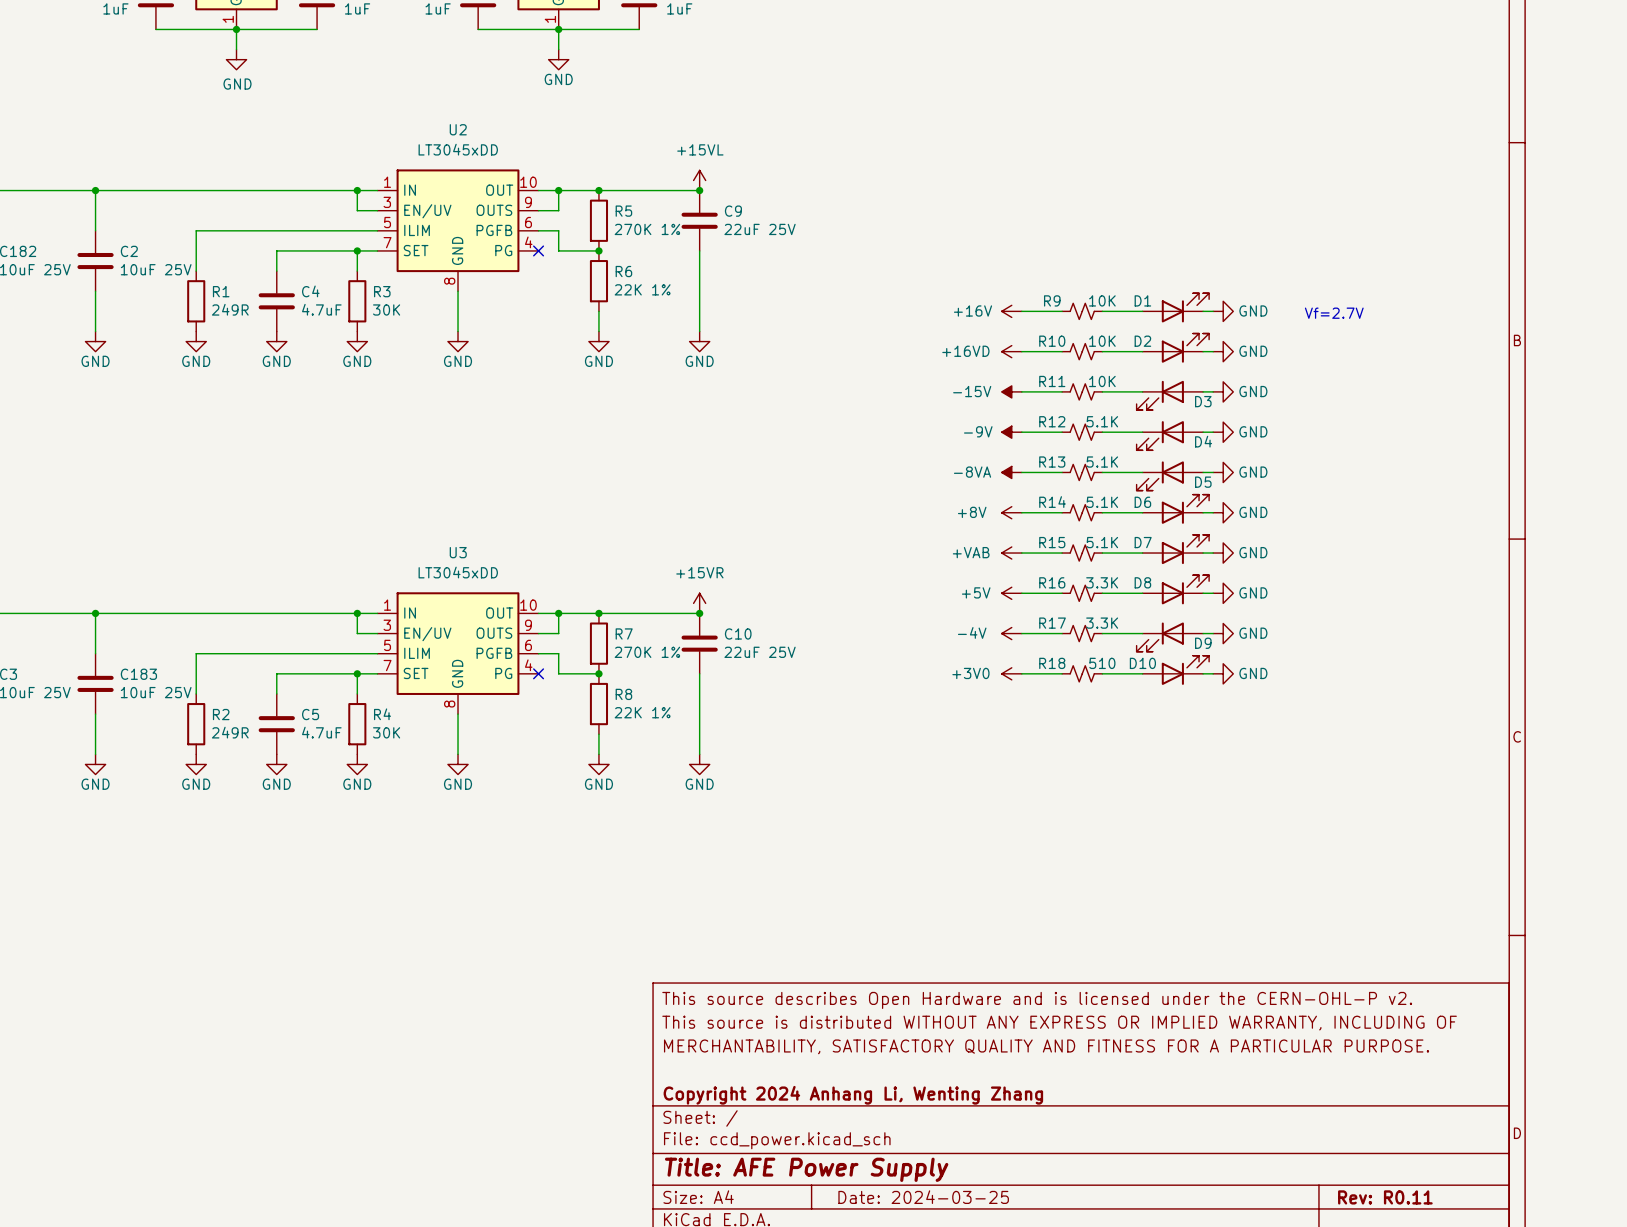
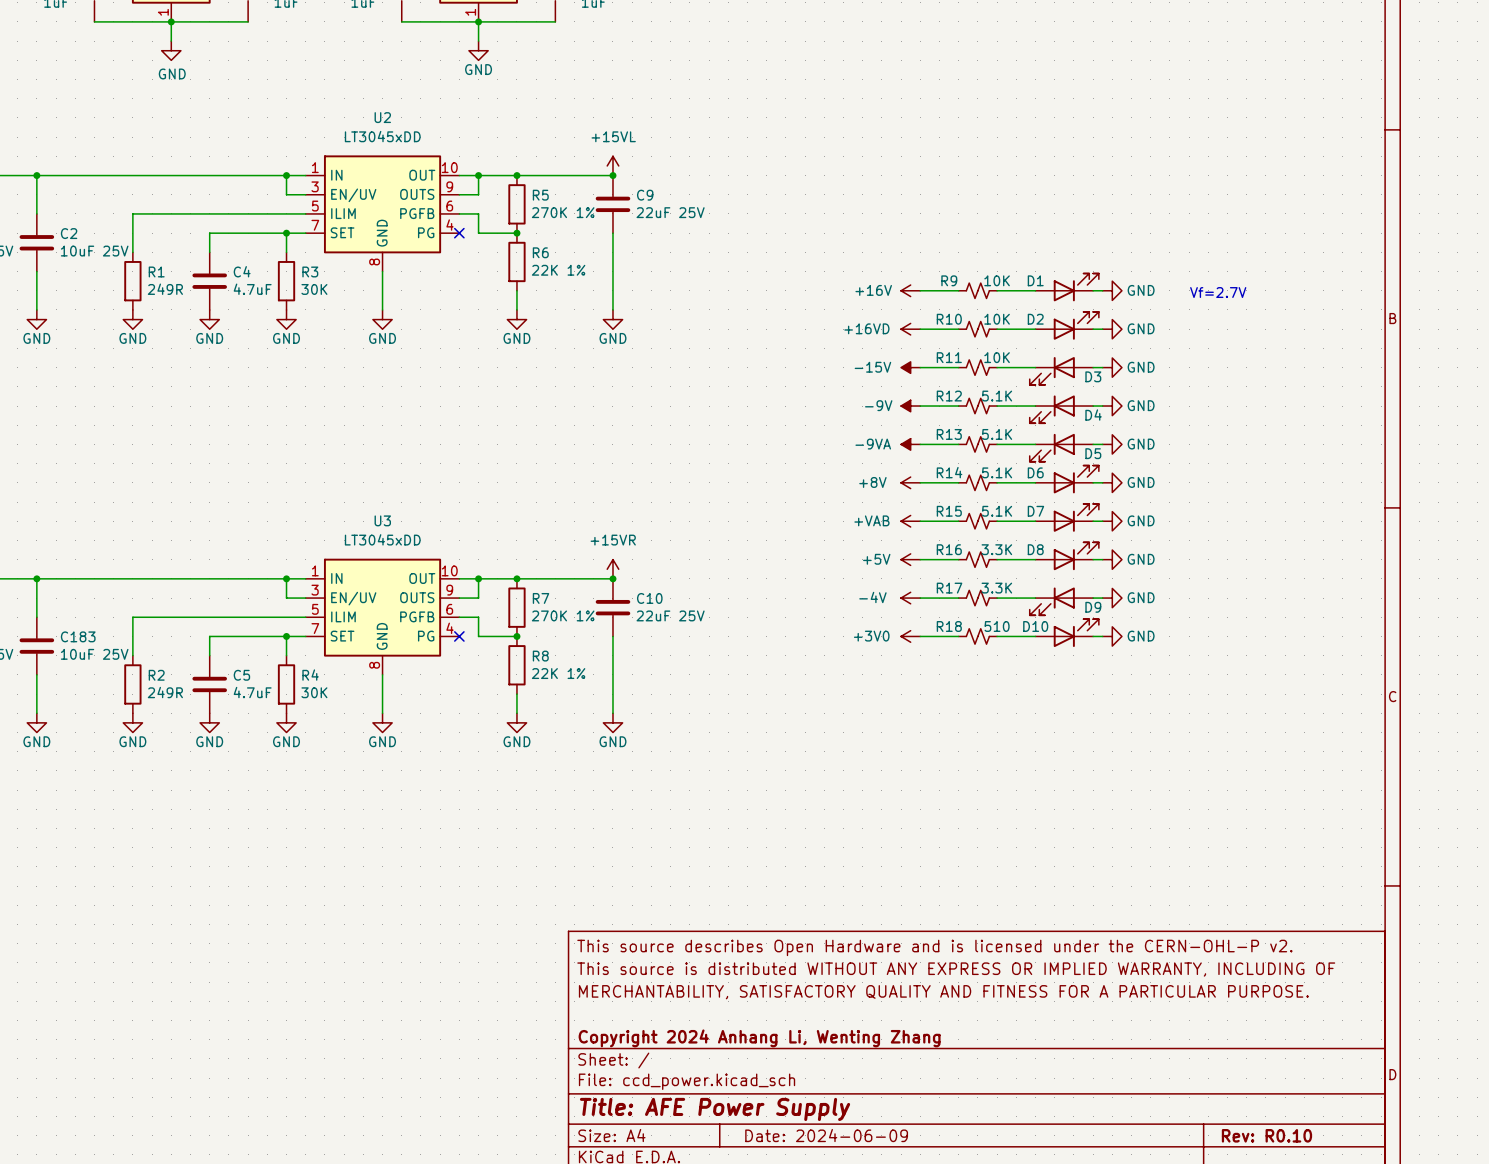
power symbol: -8VA (1011, 472) -> -9VA (910, 444)
title block: Date: 2024-03-25 (923, 1197) -> Date: 2024-06-09 (826, 1135)
title block: Rev: R0.11 (1385, 1197) -> Rev: R0.10 (1266, 1135)

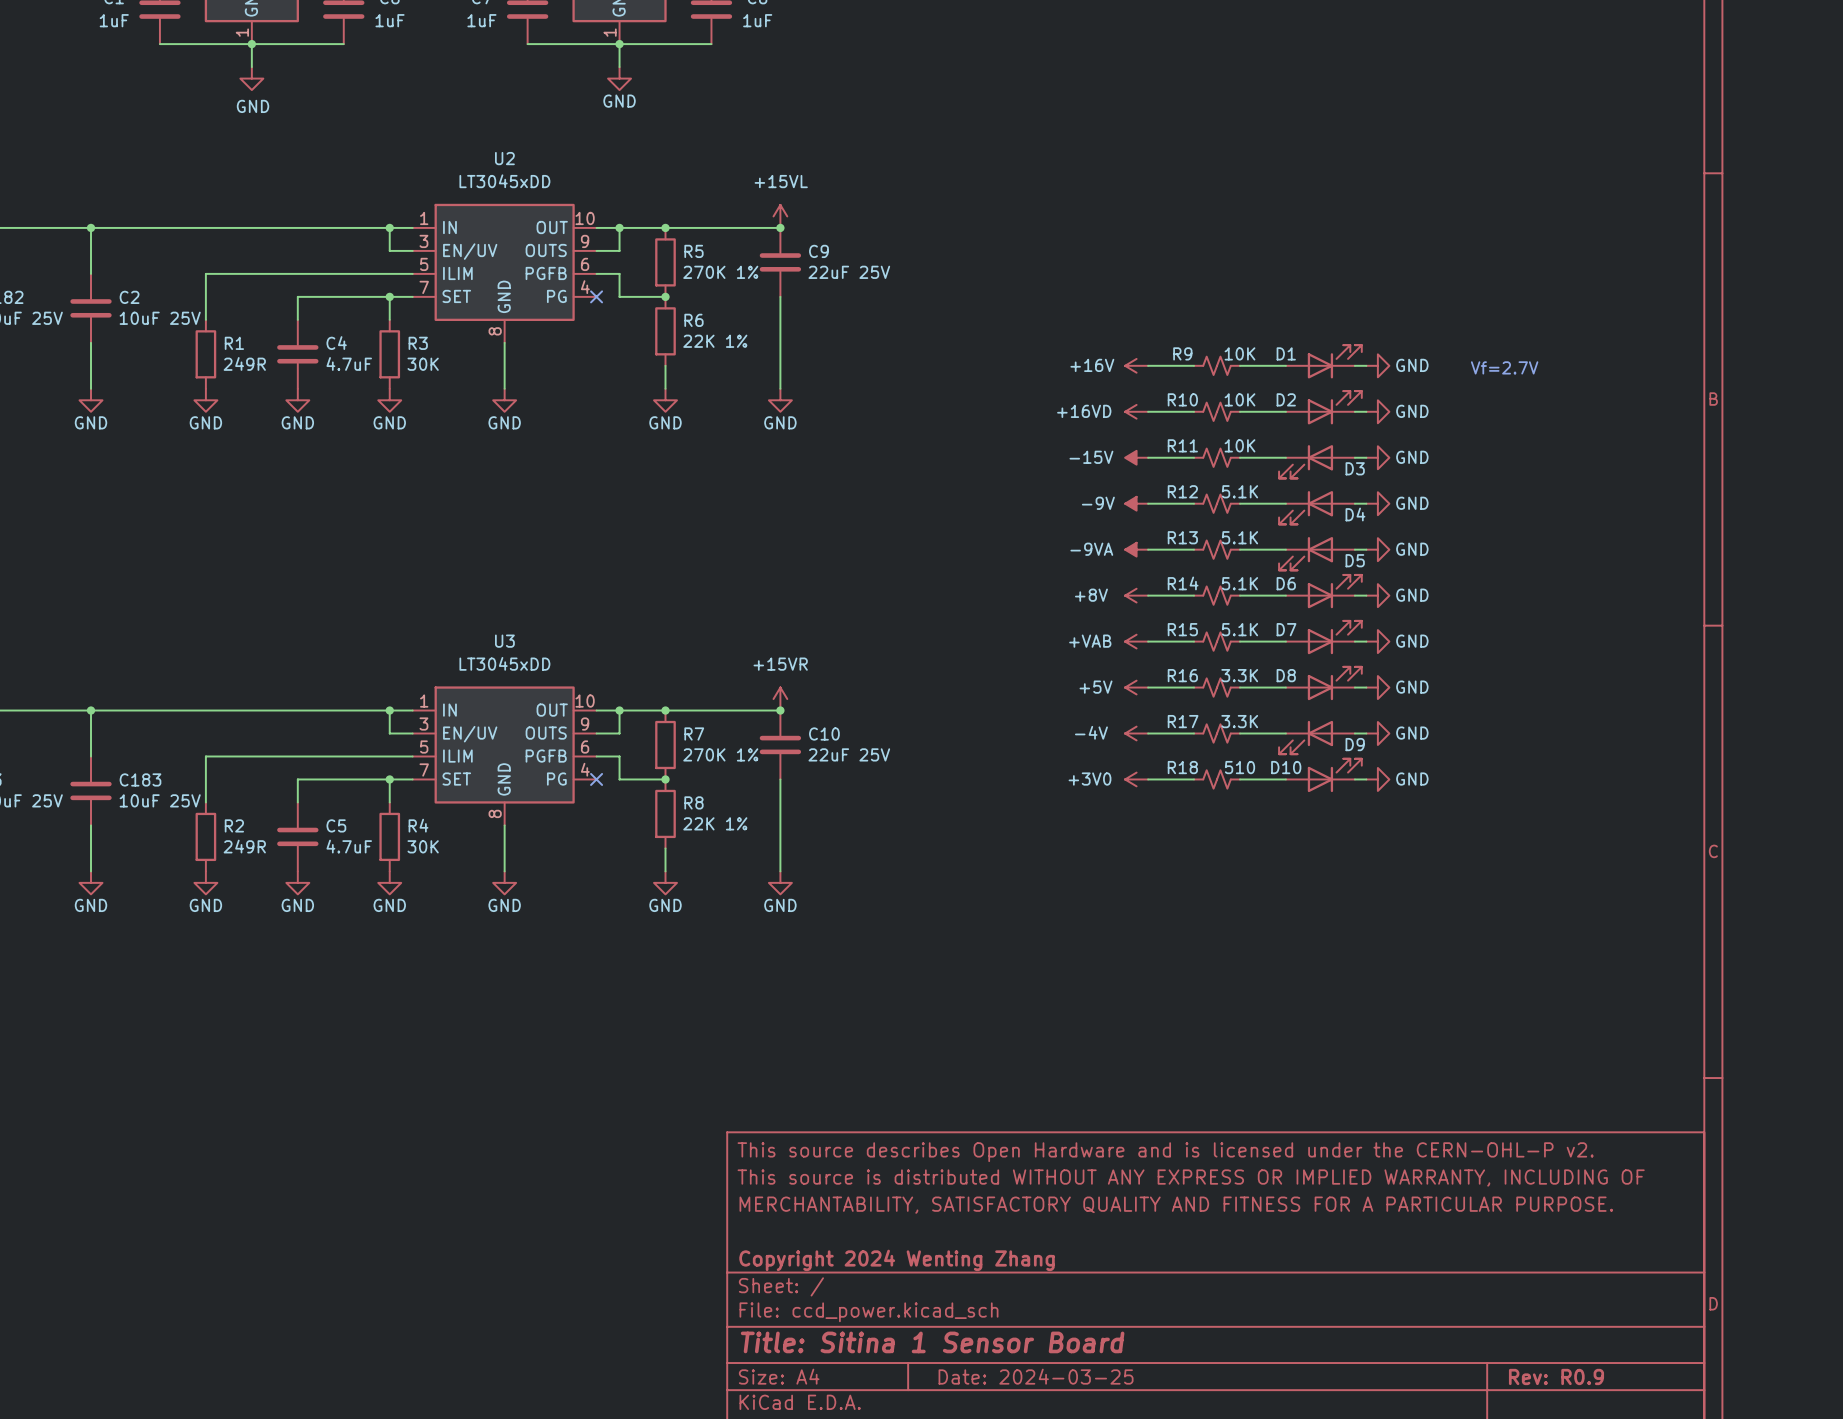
title block: Copyright 2024 Anhang Li, Wenting Zhang (759, 1038) -> Copyright 2024 Wenting Zhang (897, 1260)
title block: Title: AFE Power Supply (715, 1109) -> Title: Sitina 1 Sensor Board (932, 1342)
title block: Date: 2024-06-09 (826, 1135) -> Date: 2024-03-25 (1036, 1376)
title block: Rev: R0.10 (1266, 1135) -> Rev: R0.9 (1556, 1376)

